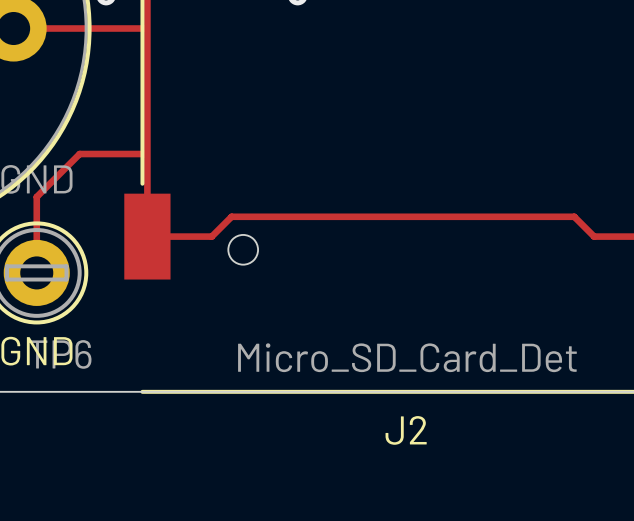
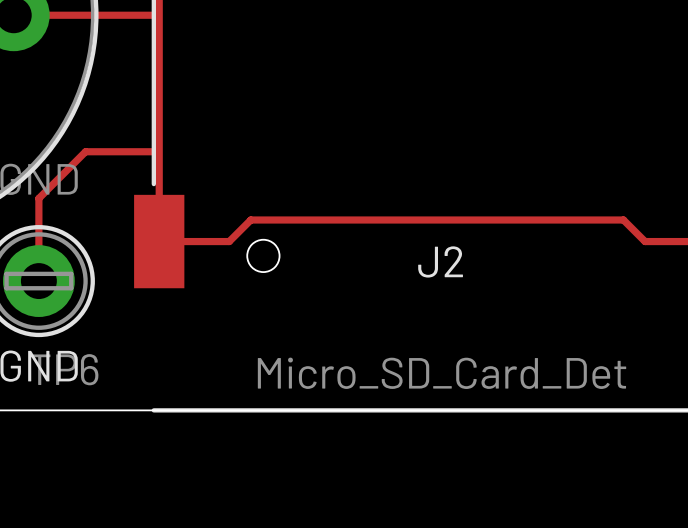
J2 name position: J2 (406, 430) -> J2 (440, 261)

